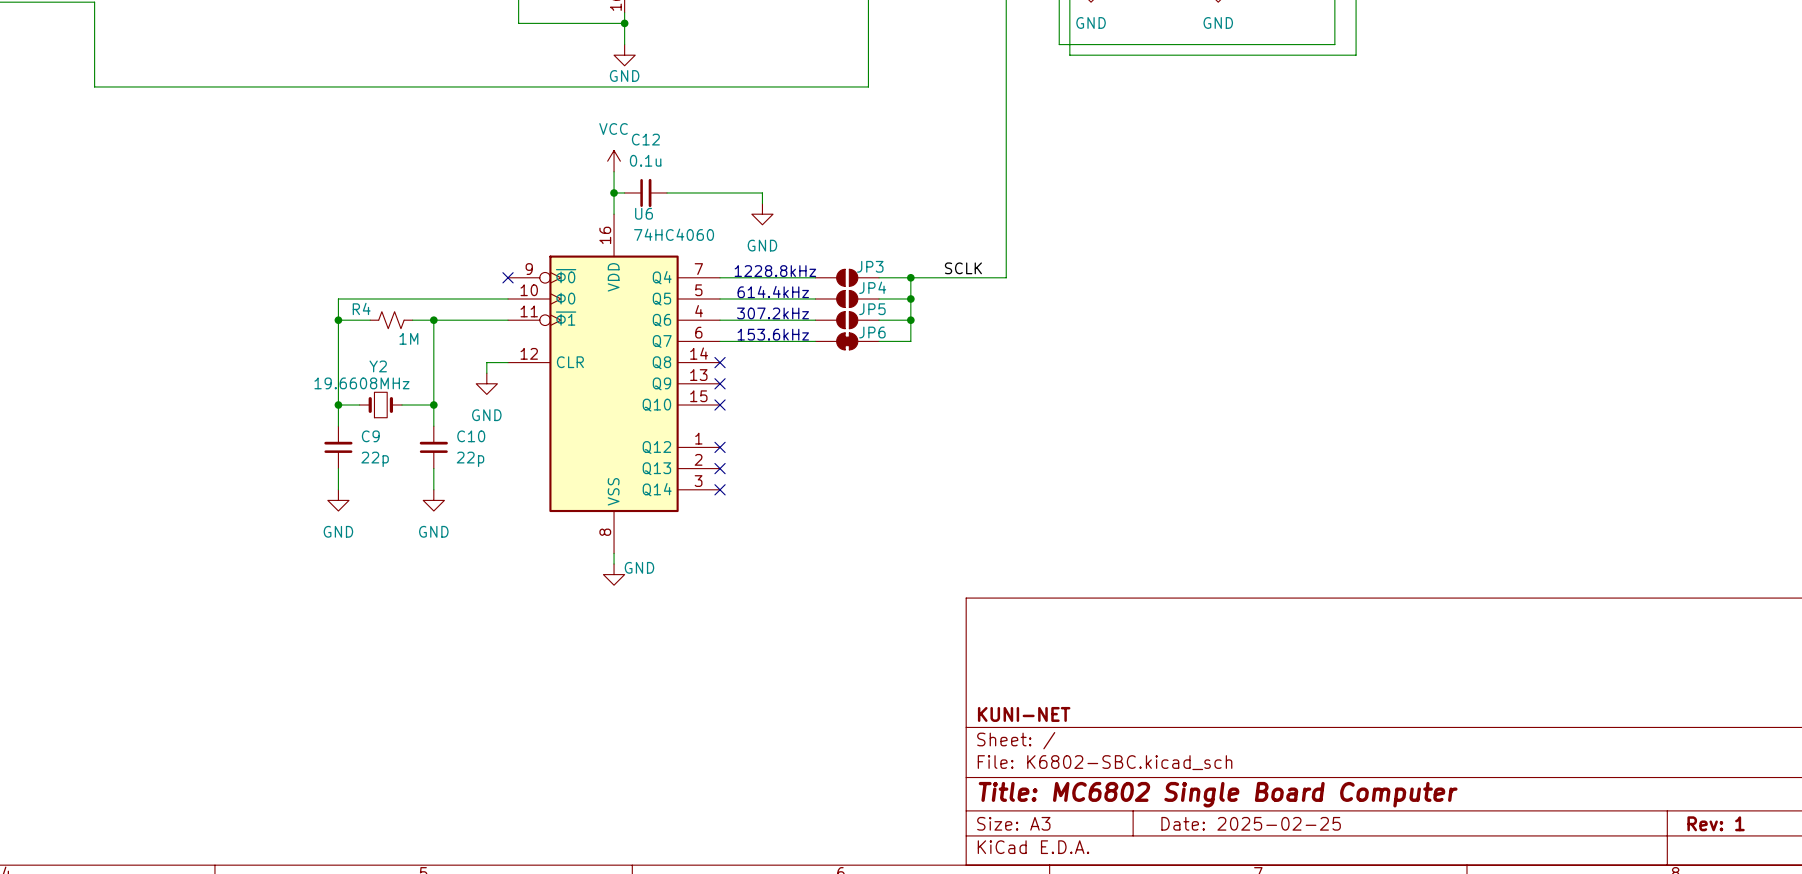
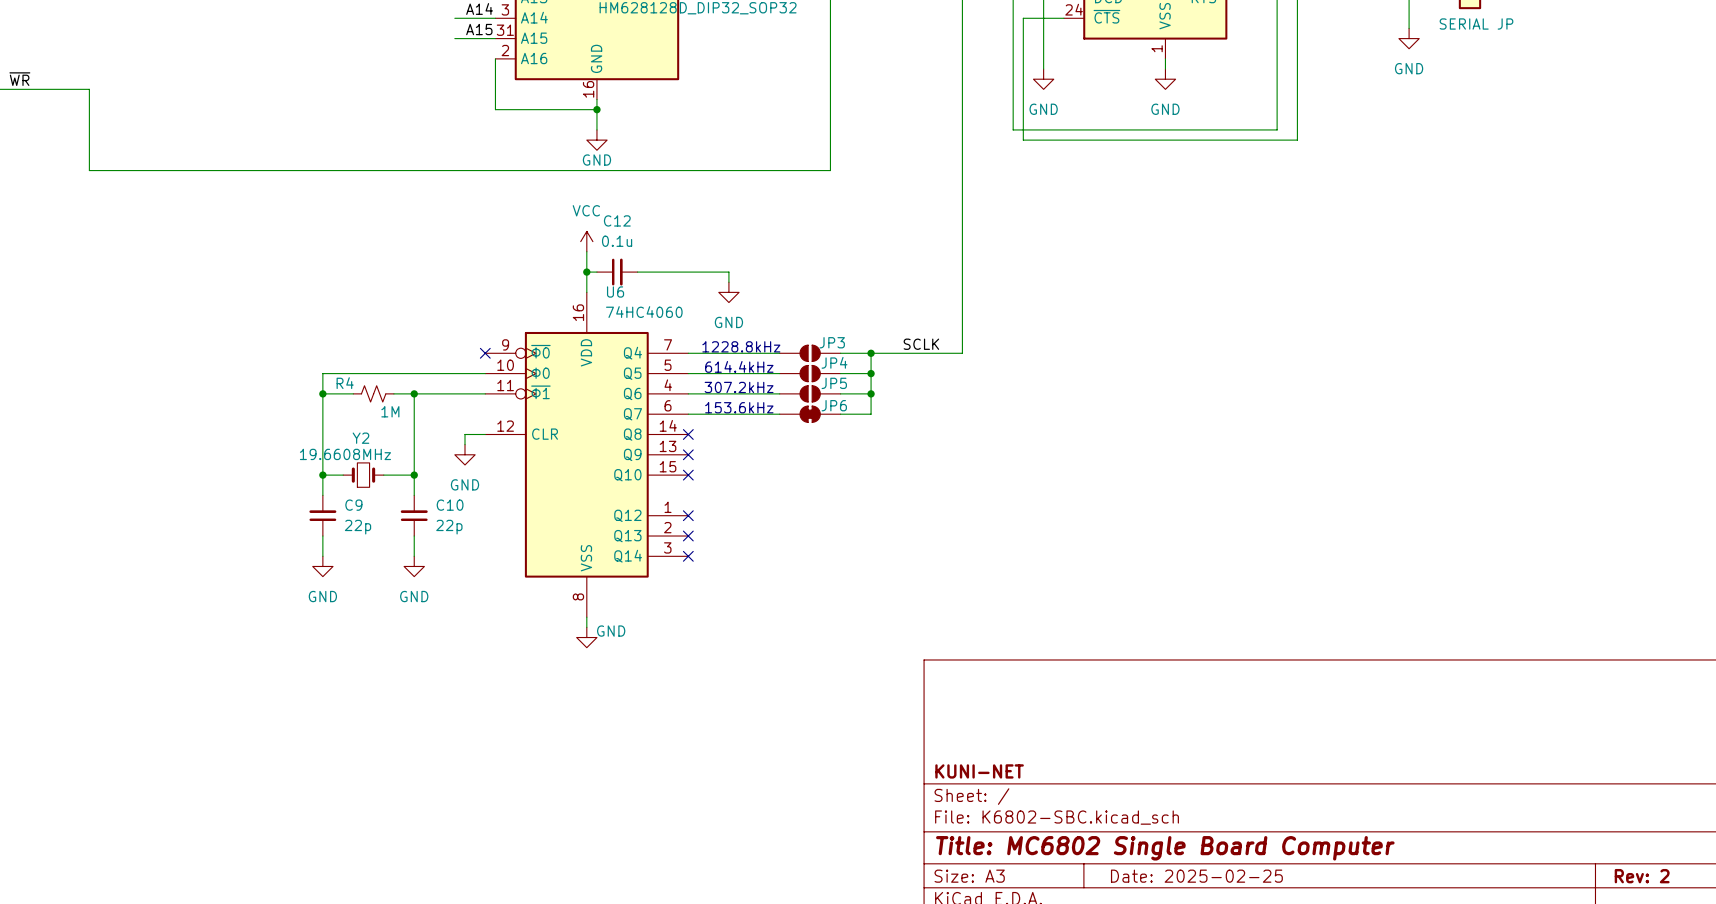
title block: Rev: 1 (1716, 823) -> Rev: 2 (1642, 876)

